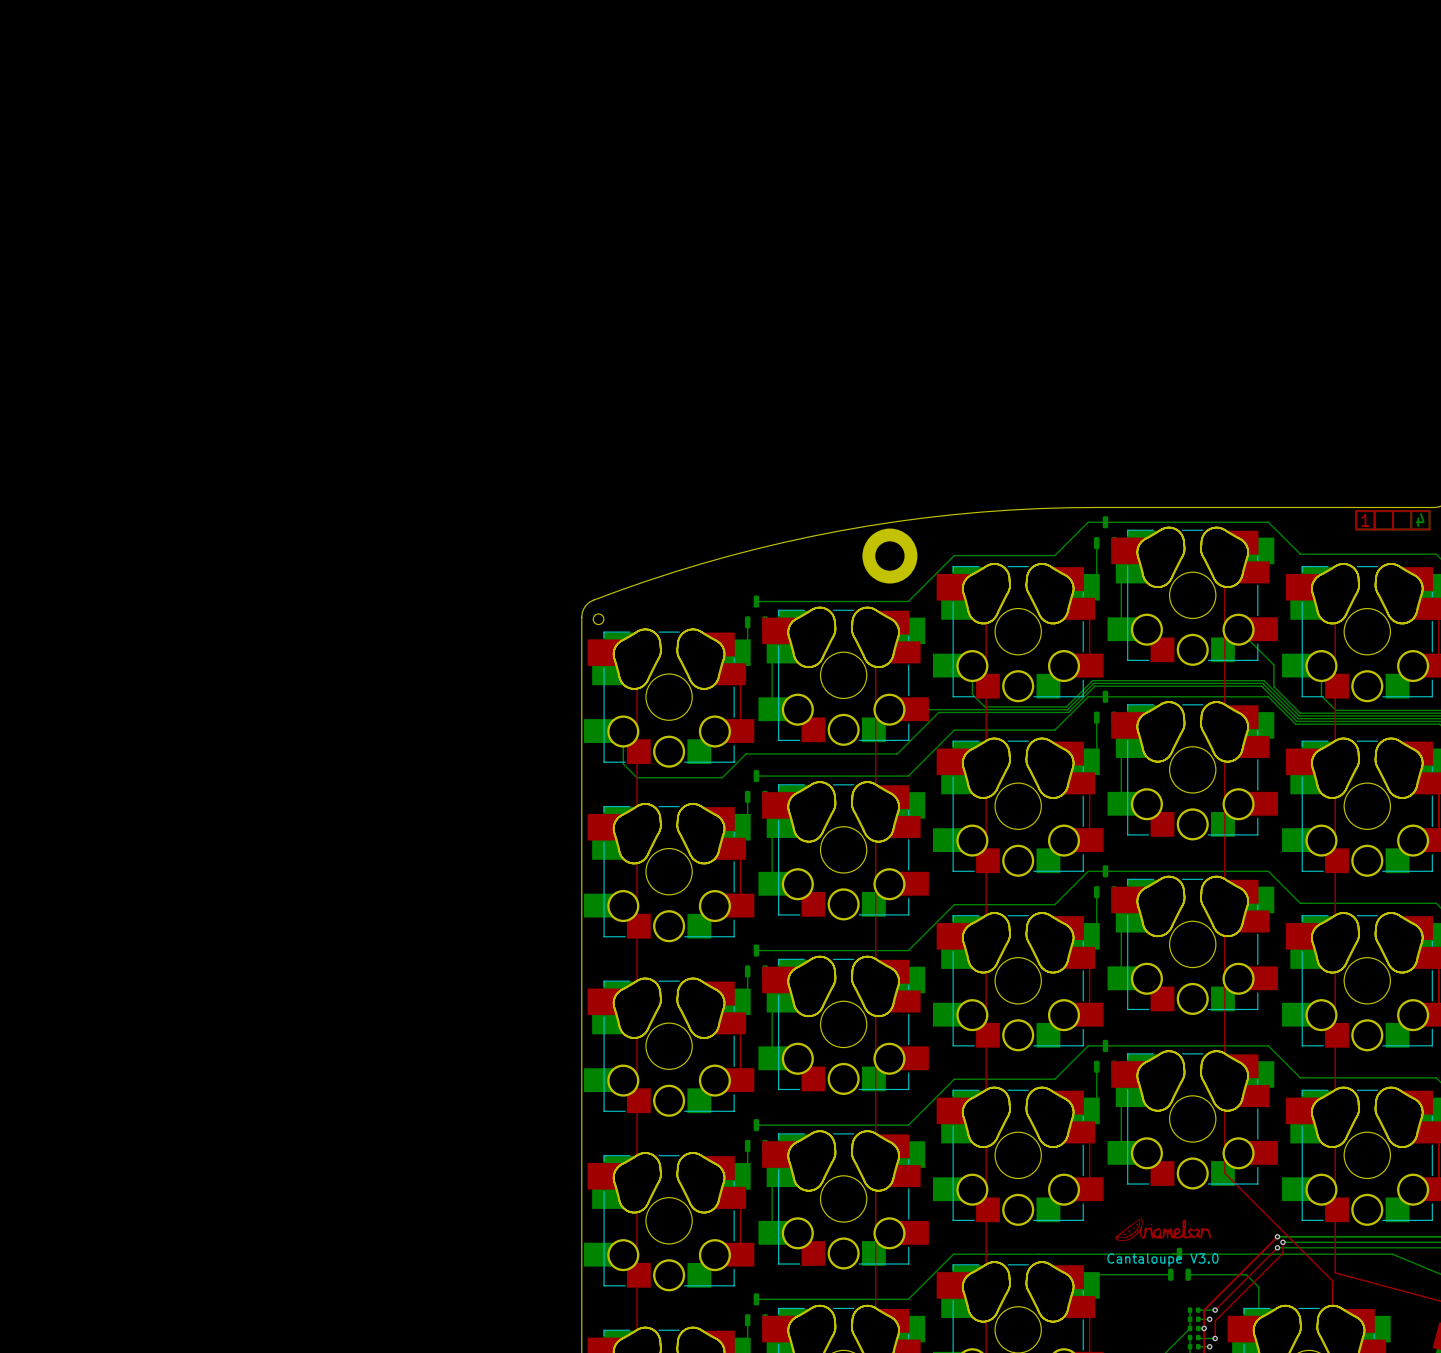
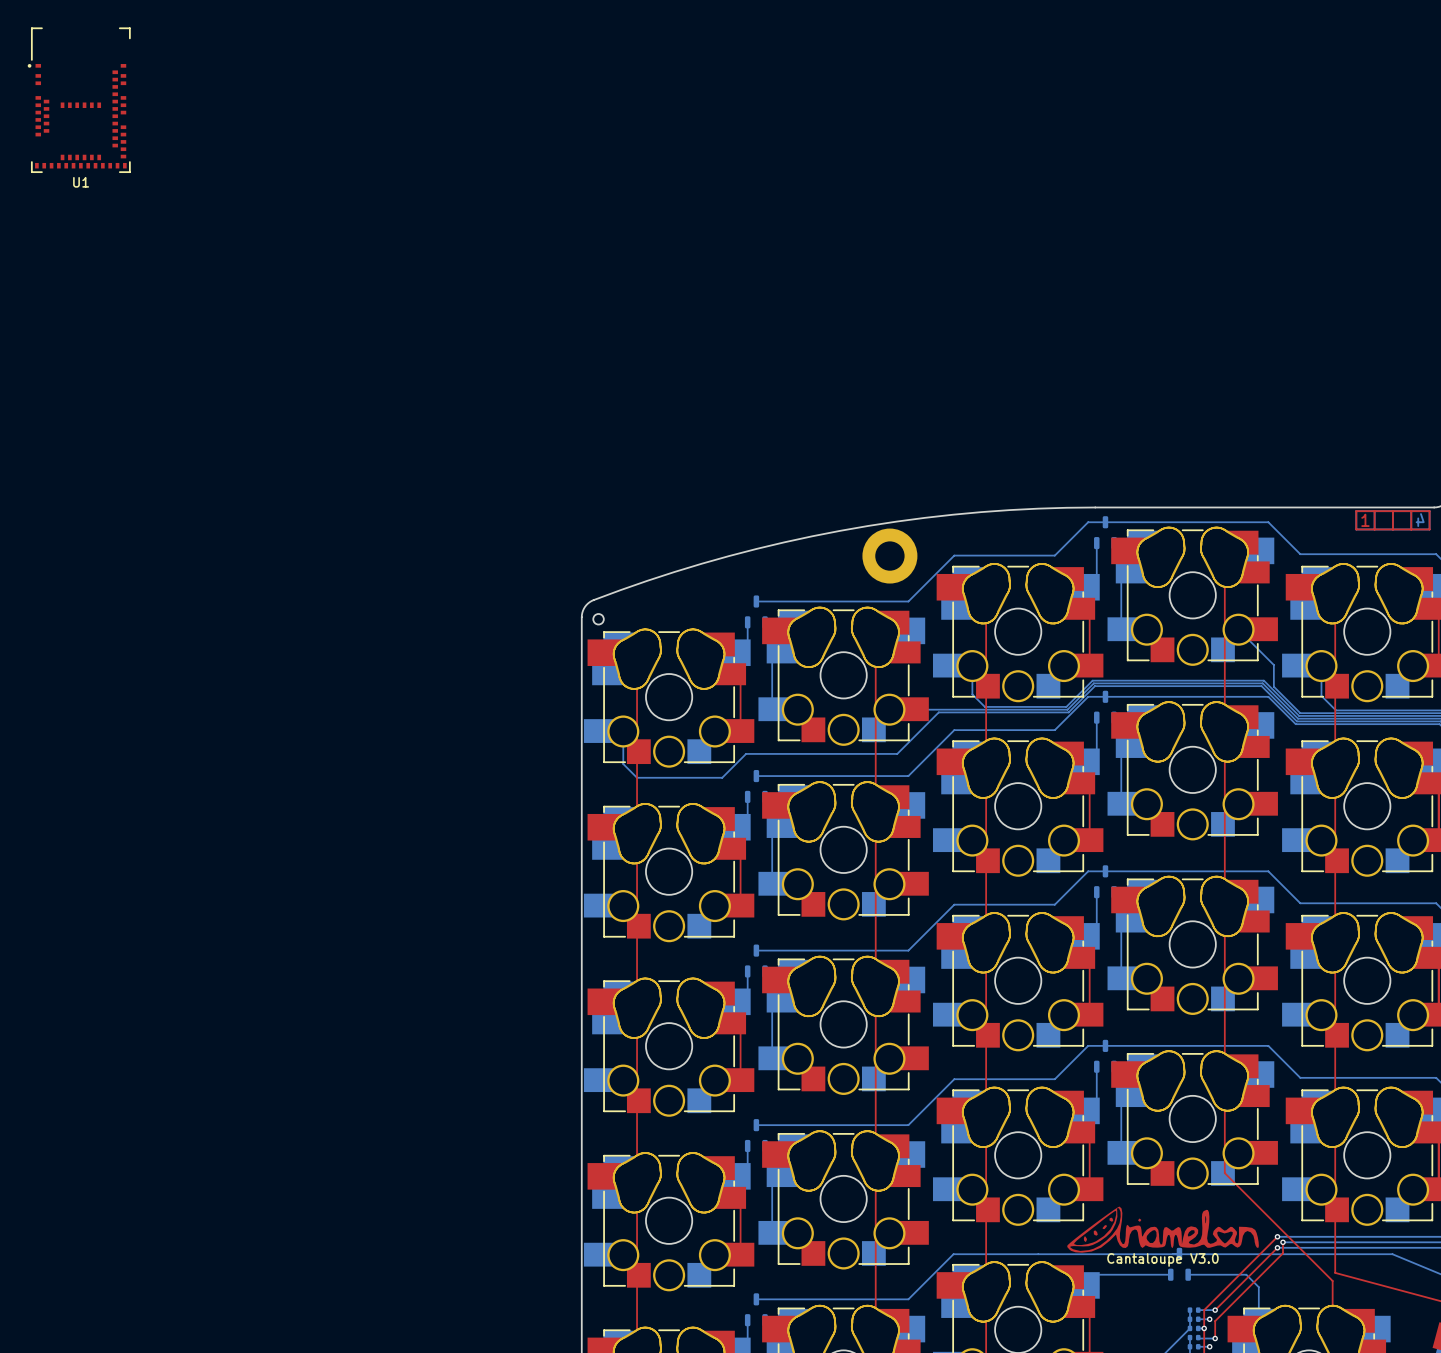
U1: none -> (79, 100)
drawing shape: [1115, 1218, 1211, 1242] -> [1067, 1206, 1259, 1253]

